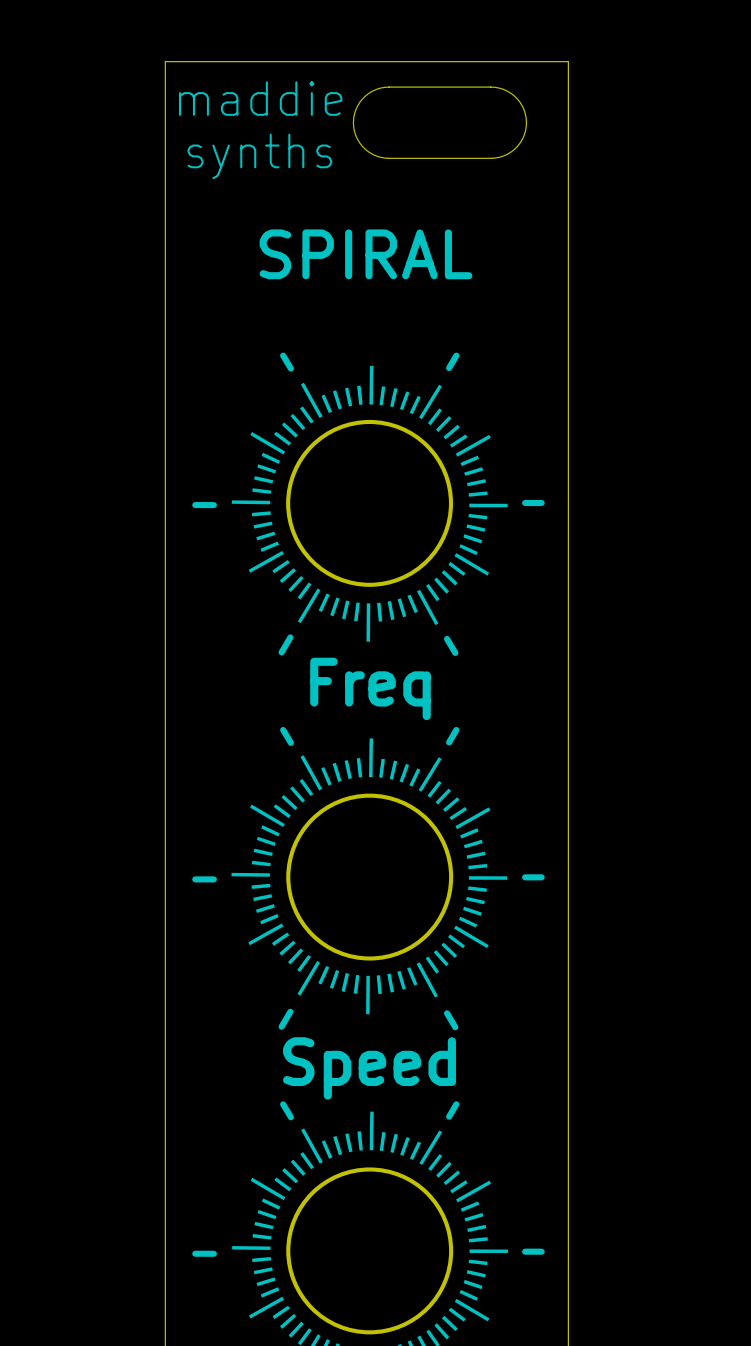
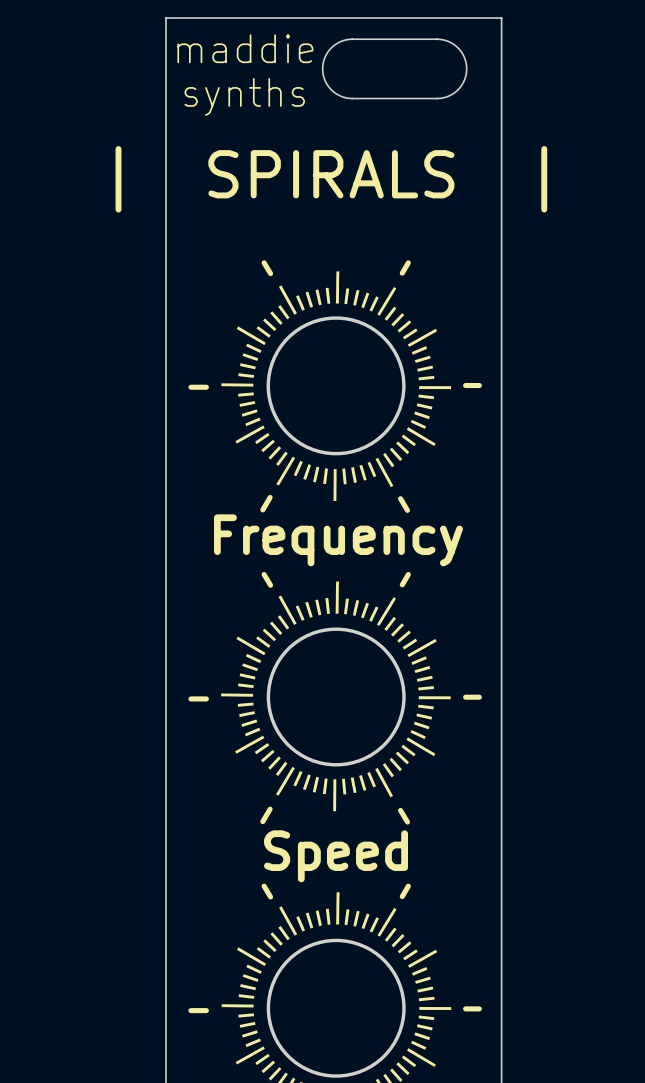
text: SPIRAL (365, 254) -> | SPIRALS | (331, 179)
text: Freq (370, 688) -> Frequency (338, 540)

